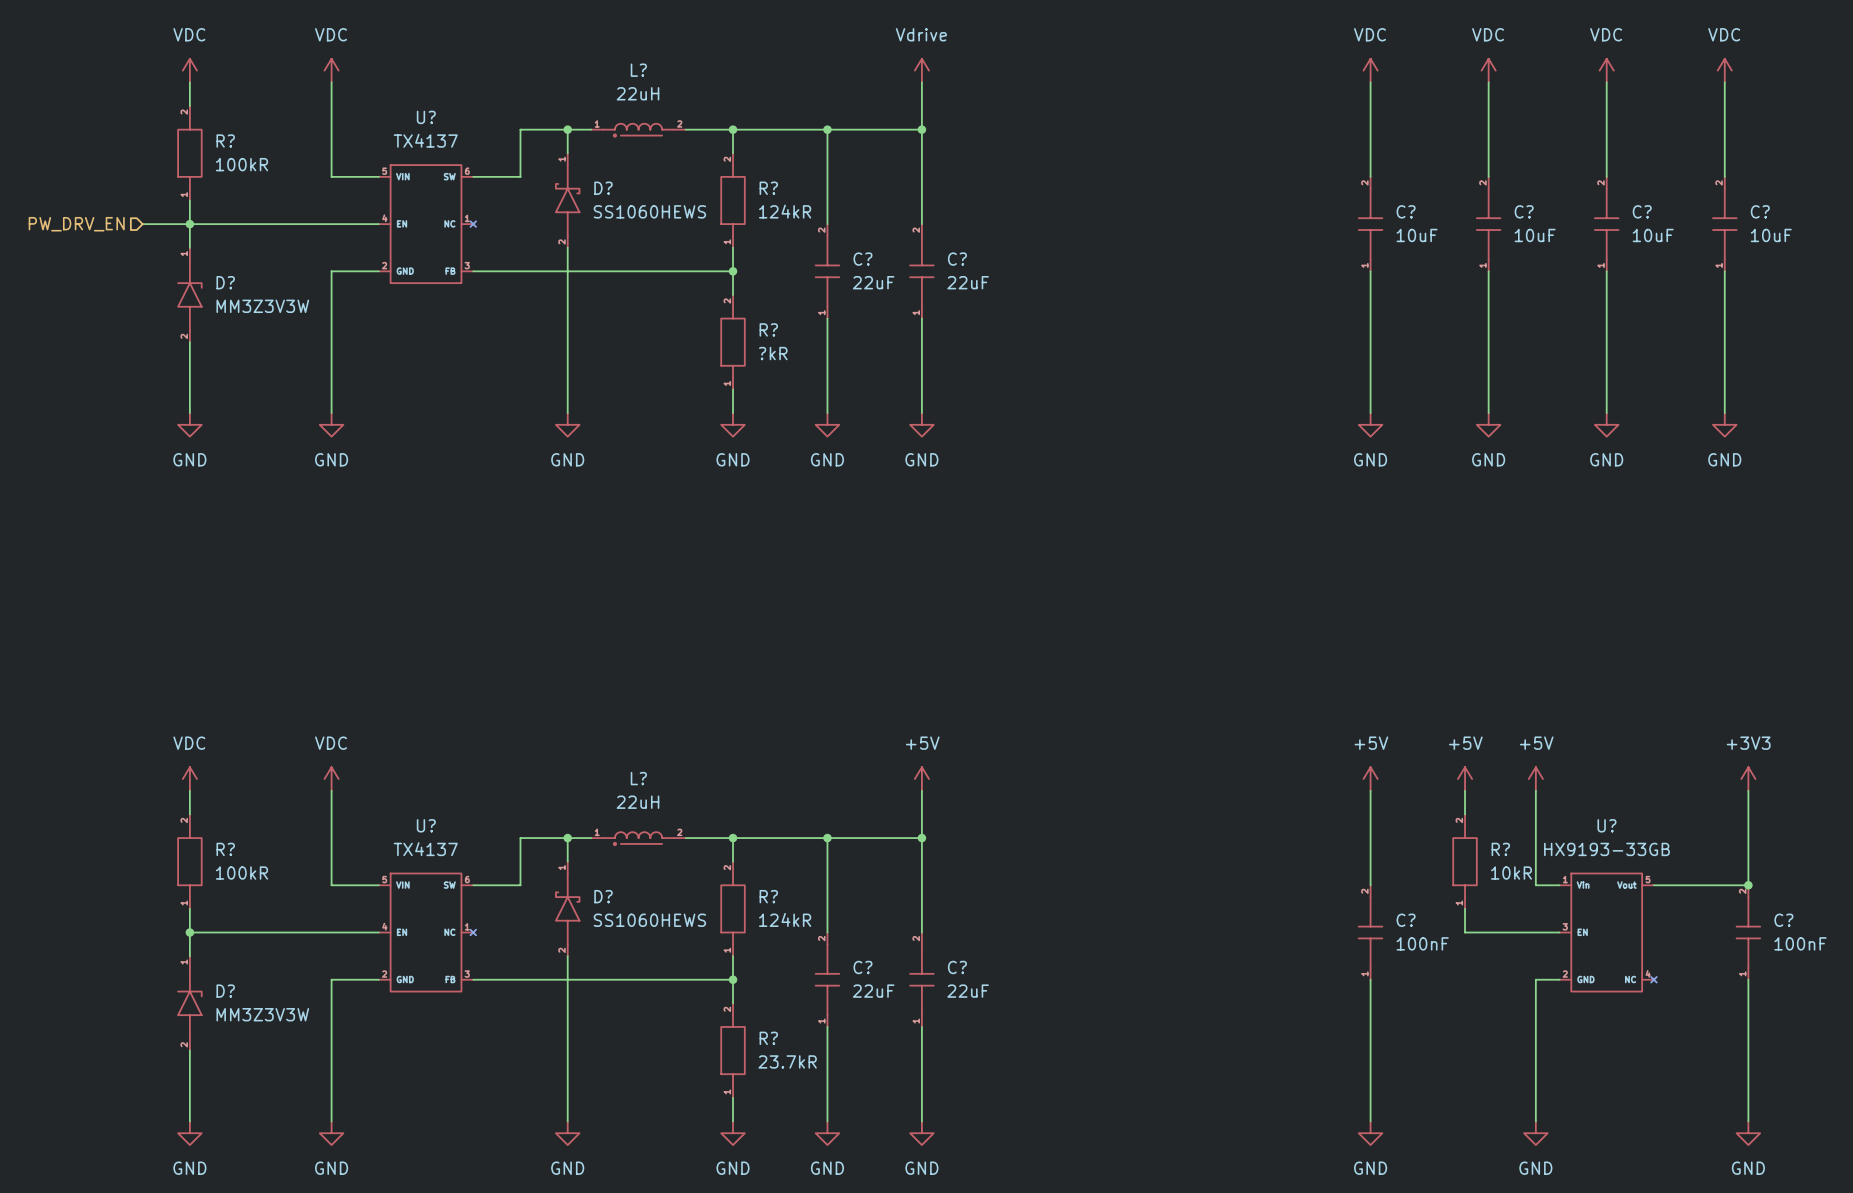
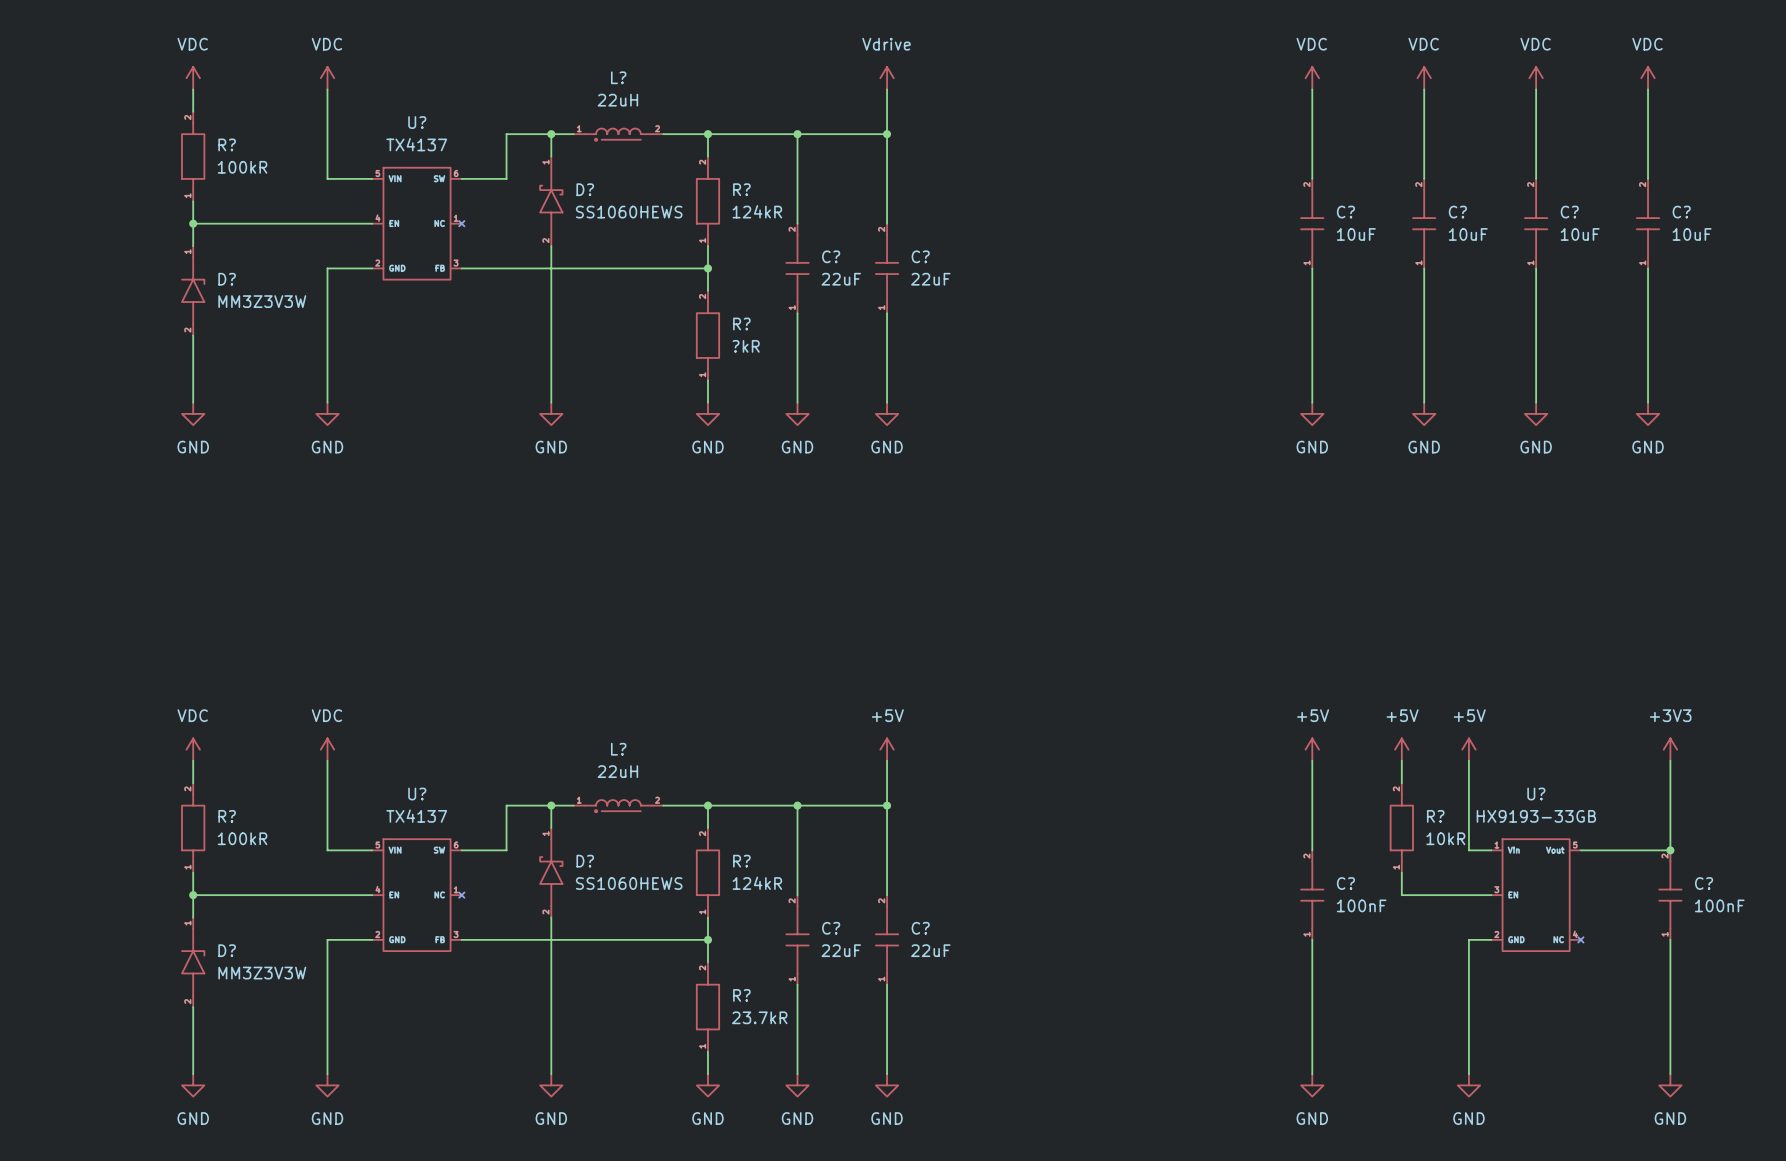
hierarchical label: PW_DRV_EN (76, 224) -> none
wire: (142, 224) (189, 224) -> none

